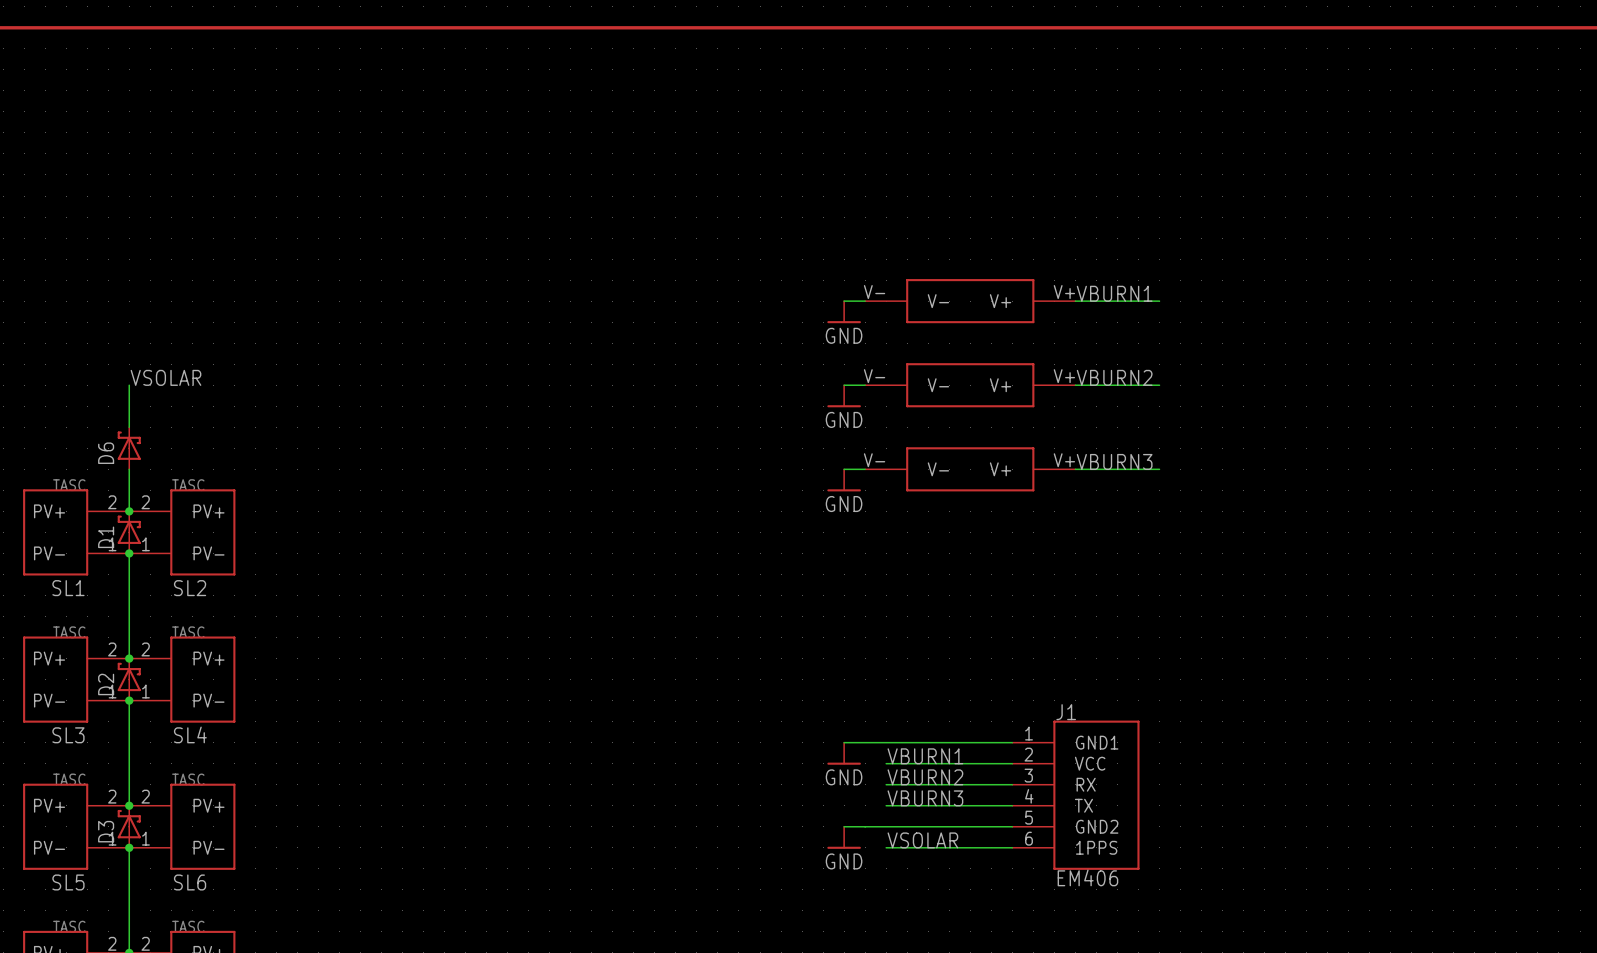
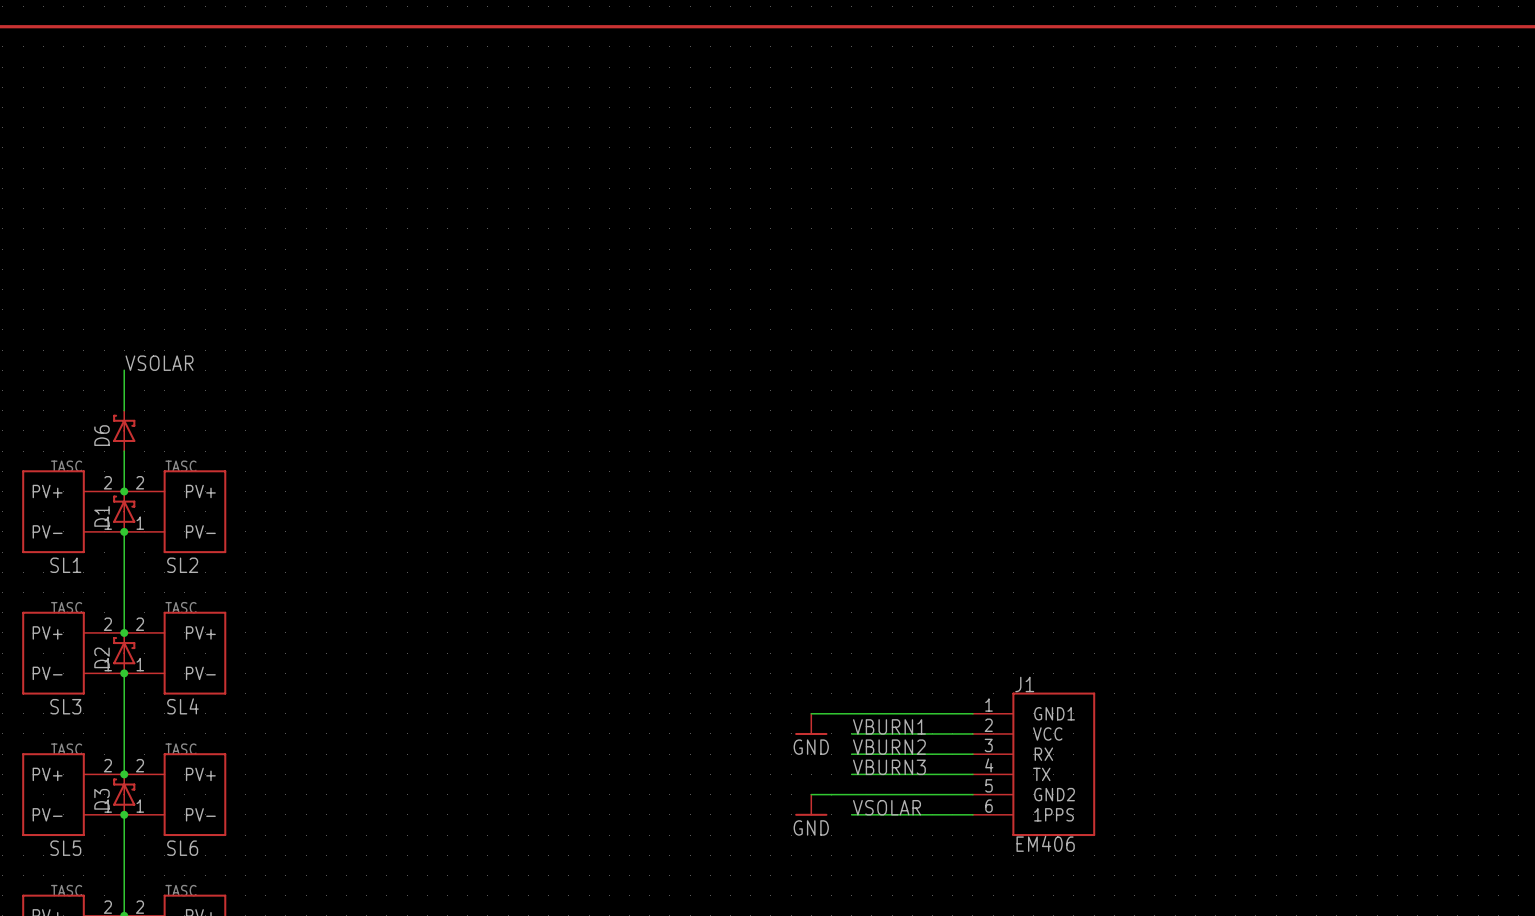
label: VBURN1 (1114, 293) -> none
wire: (844, 301) (865, 301) -> none
part: (970, 301) -> none
wire: (1075, 301) (1159, 301) -> none
power symbol: GND (844, 312) -> none
label: VBURN2 (1114, 377) -> none
wire: (844, 385) (865, 385) -> none
part: (970, 385) -> none
wire: (1075, 385) (1159, 385) -> none
power symbol: GND (844, 396) -> none
label: VBURN3 (1114, 461) -> none
wire: (844, 469) (865, 469) -> none
part: (970, 469) -> none
wire: (1075, 469) (1159, 469) -> none
power symbol: GND (844, 480) -> none

